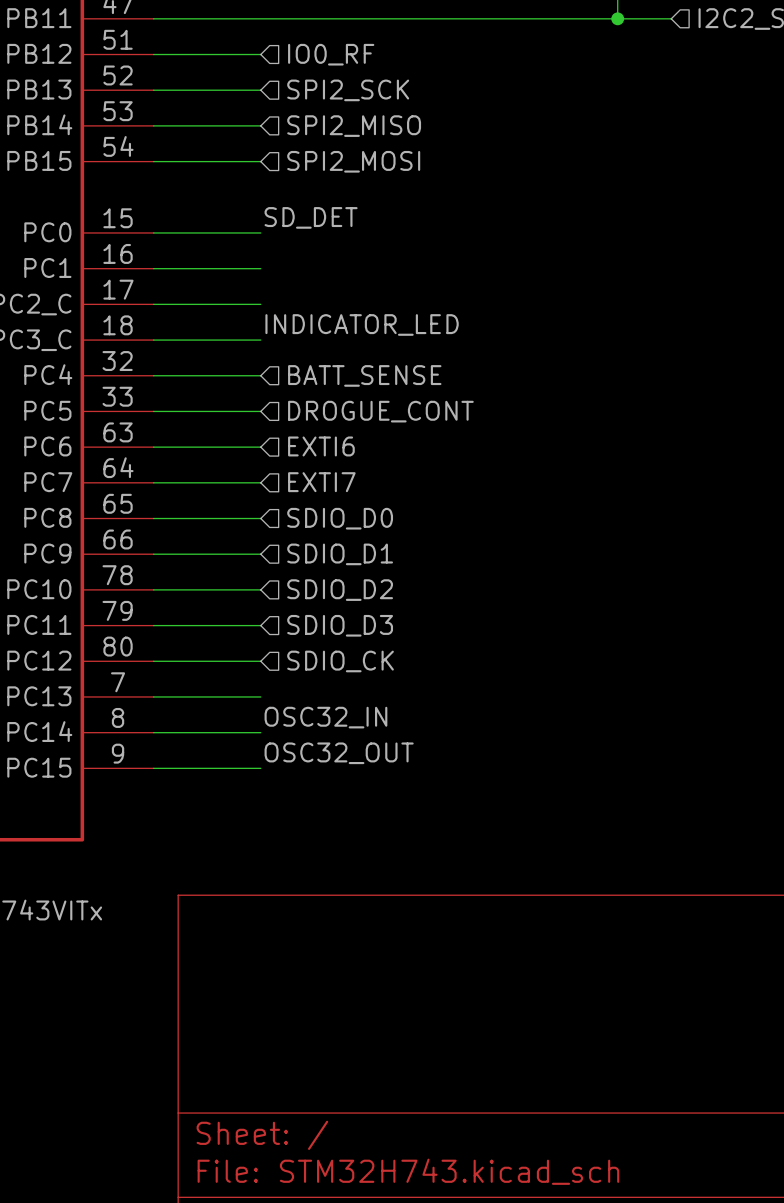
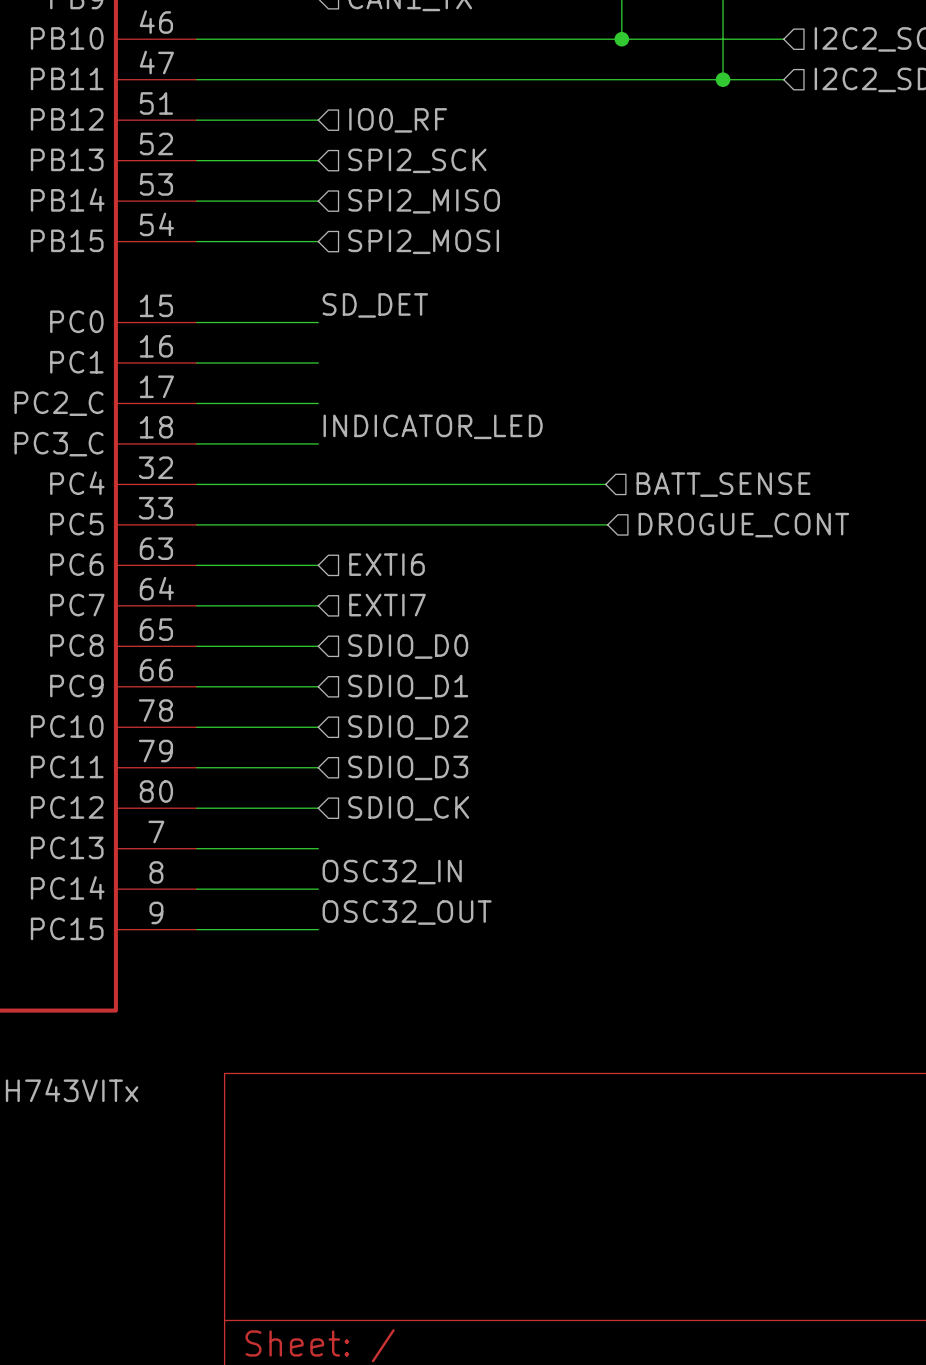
wire: none -> (318, 484) (605, 484)
hierarchical label position: BATT_SENSE (364, 375) -> BATT_SENSE (723, 484)
wire: none -> (318, 524) (607, 524)
hierarchical label position: DROGUE_CONT (380, 411) -> DROGUE_CONT (743, 525)

